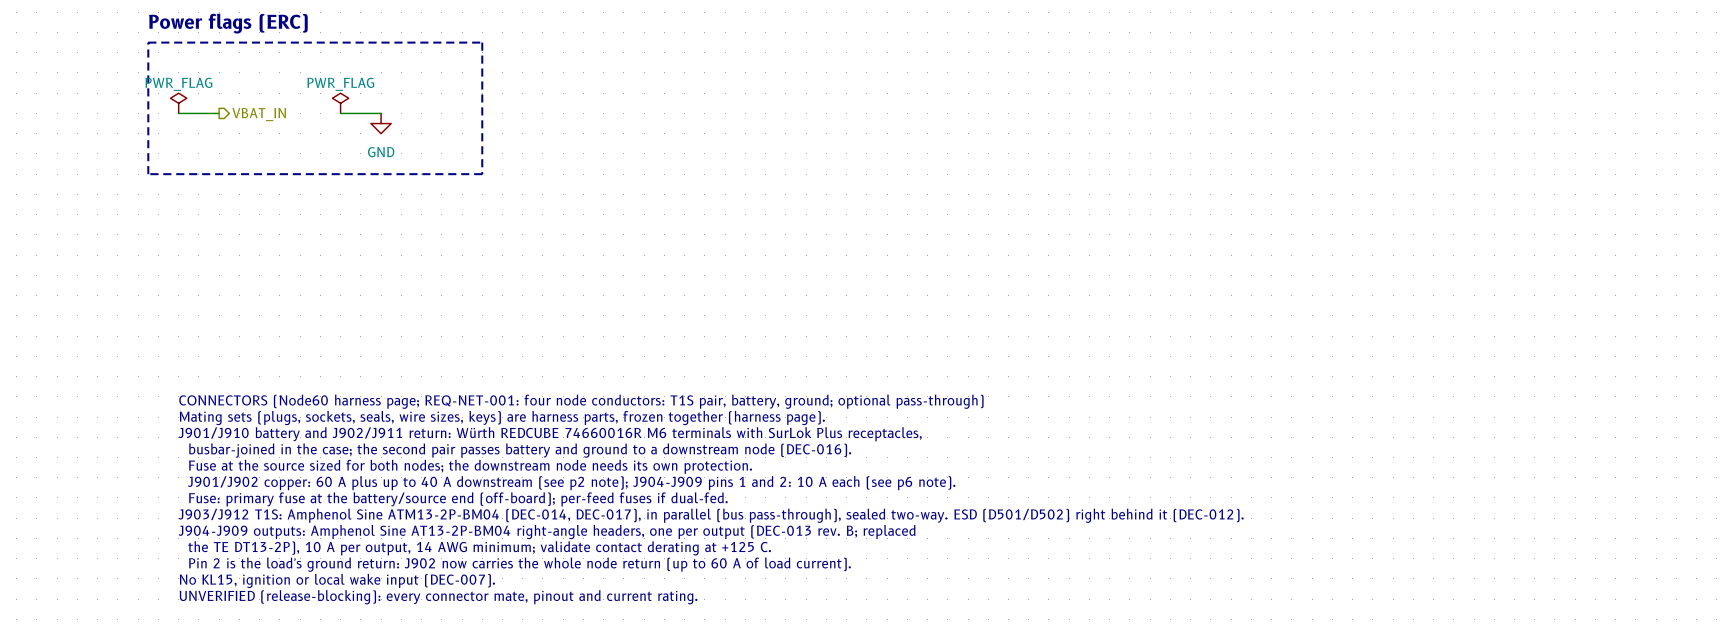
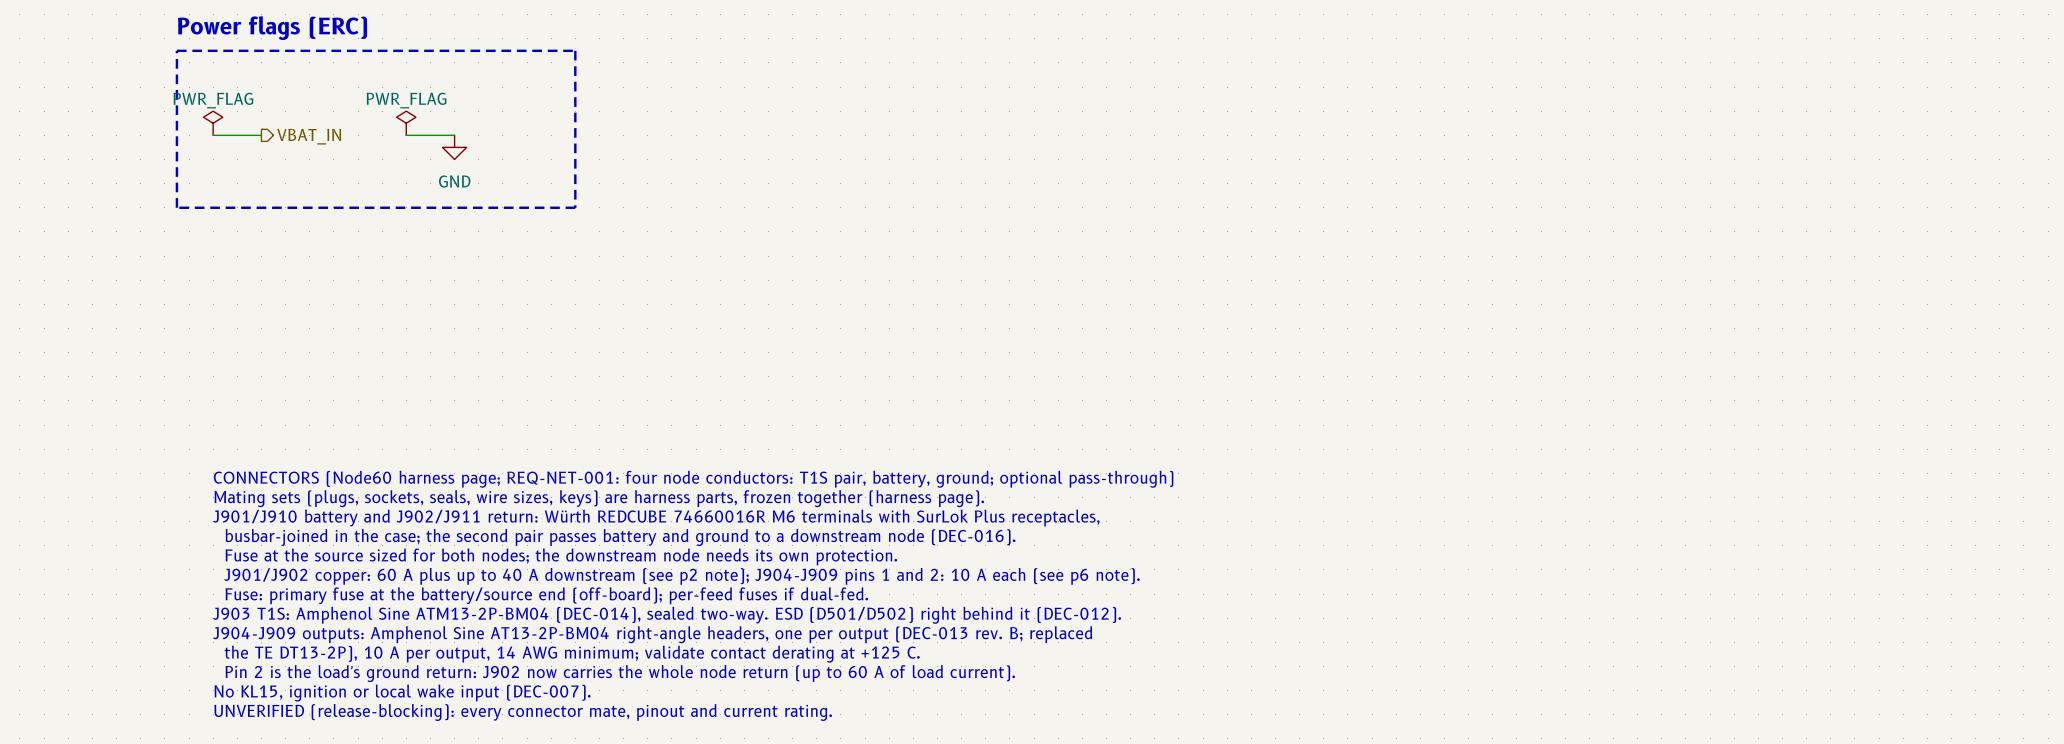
text: J903/J912 T1S: Amphenol Sine ATM13-2P-BM04 (DEC-014, DEC-017), in parallel (bus pass-through), sealed two-way. ESD (D501/D502) right behind it (DEC-012). (711, 515) -> J903 T1S: Amphenol Sine ATM13-2P-BM04 (DEC-014), sealed two-way. ESD (D501/D502) right behind it (DEC-012). (667, 615)

